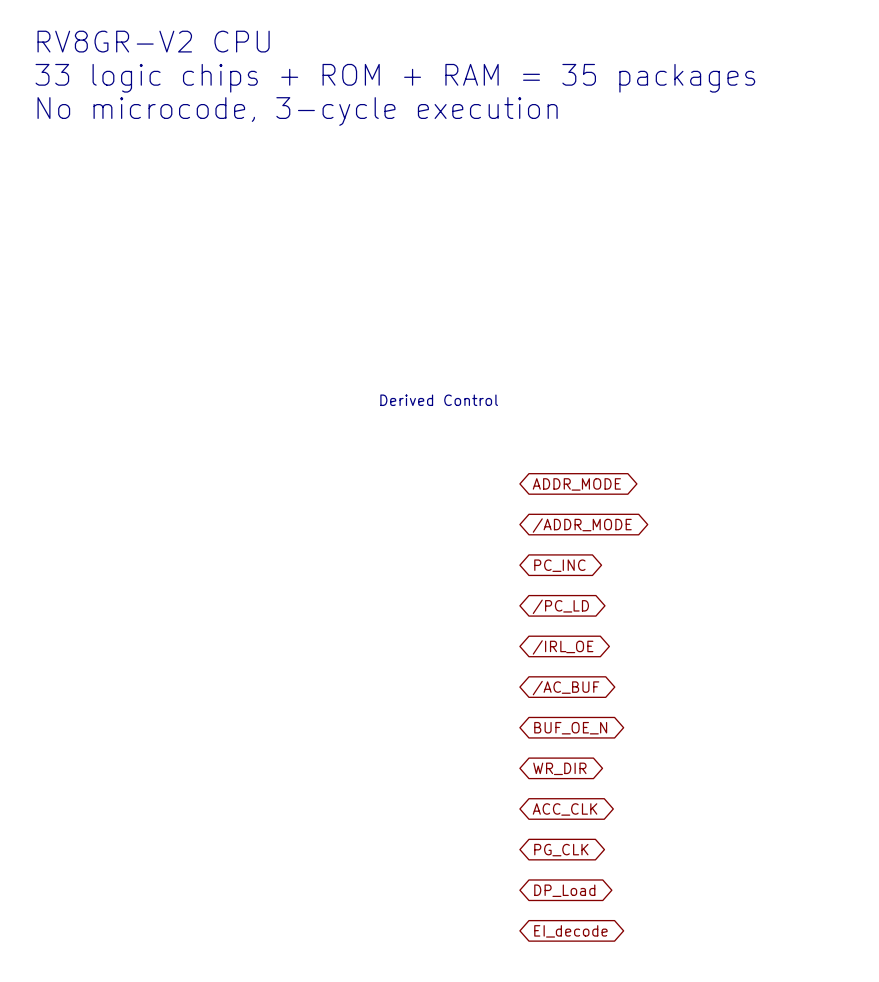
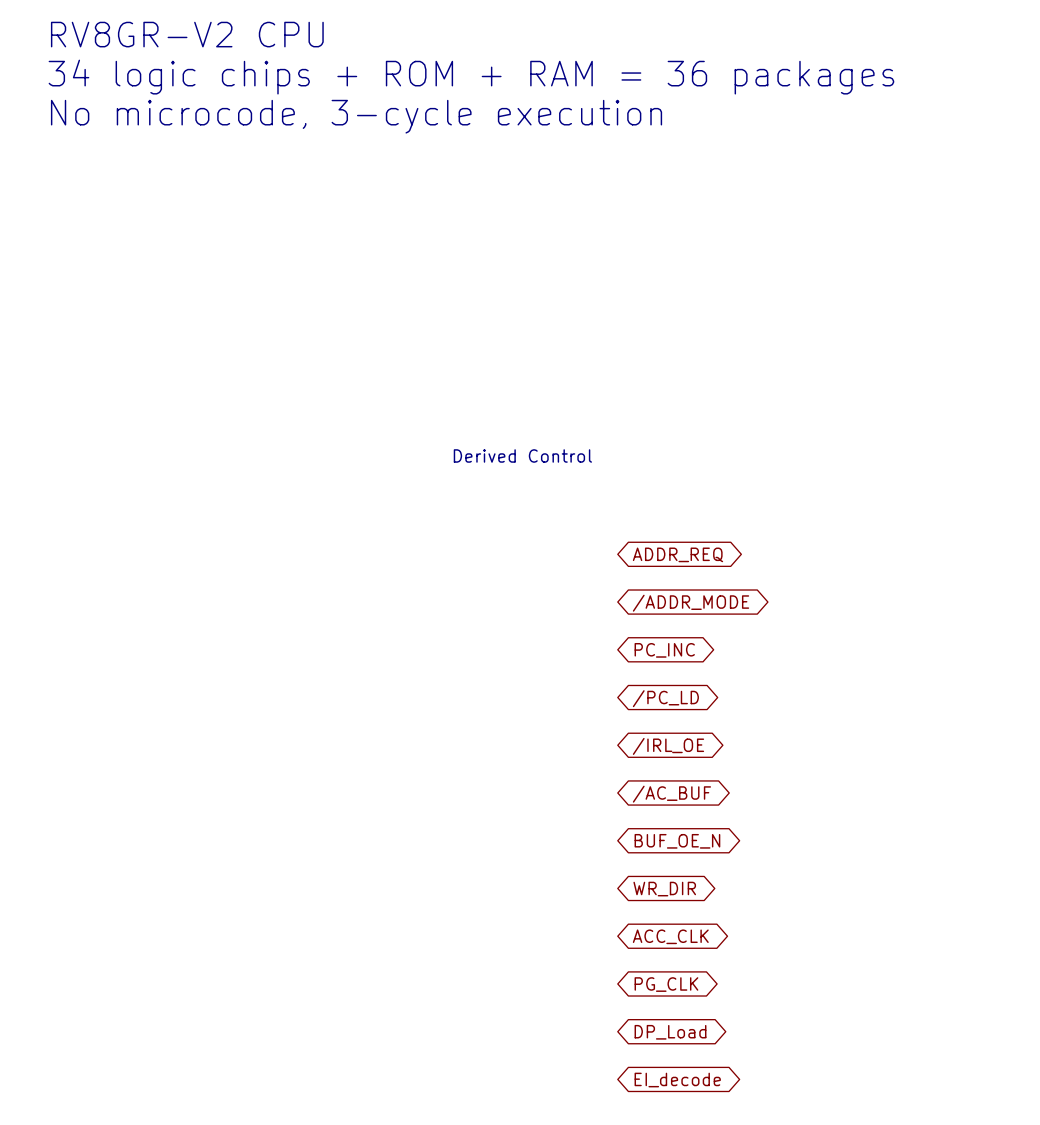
text: 33 logic chips + ROM + RAM = 35 packages (395, 78) -> 34 logic chips + ROM + RAM = 36 packages (471, 77)
global label: ADDR_MODE (576, 484) -> ADDR_REQ (678, 554)

